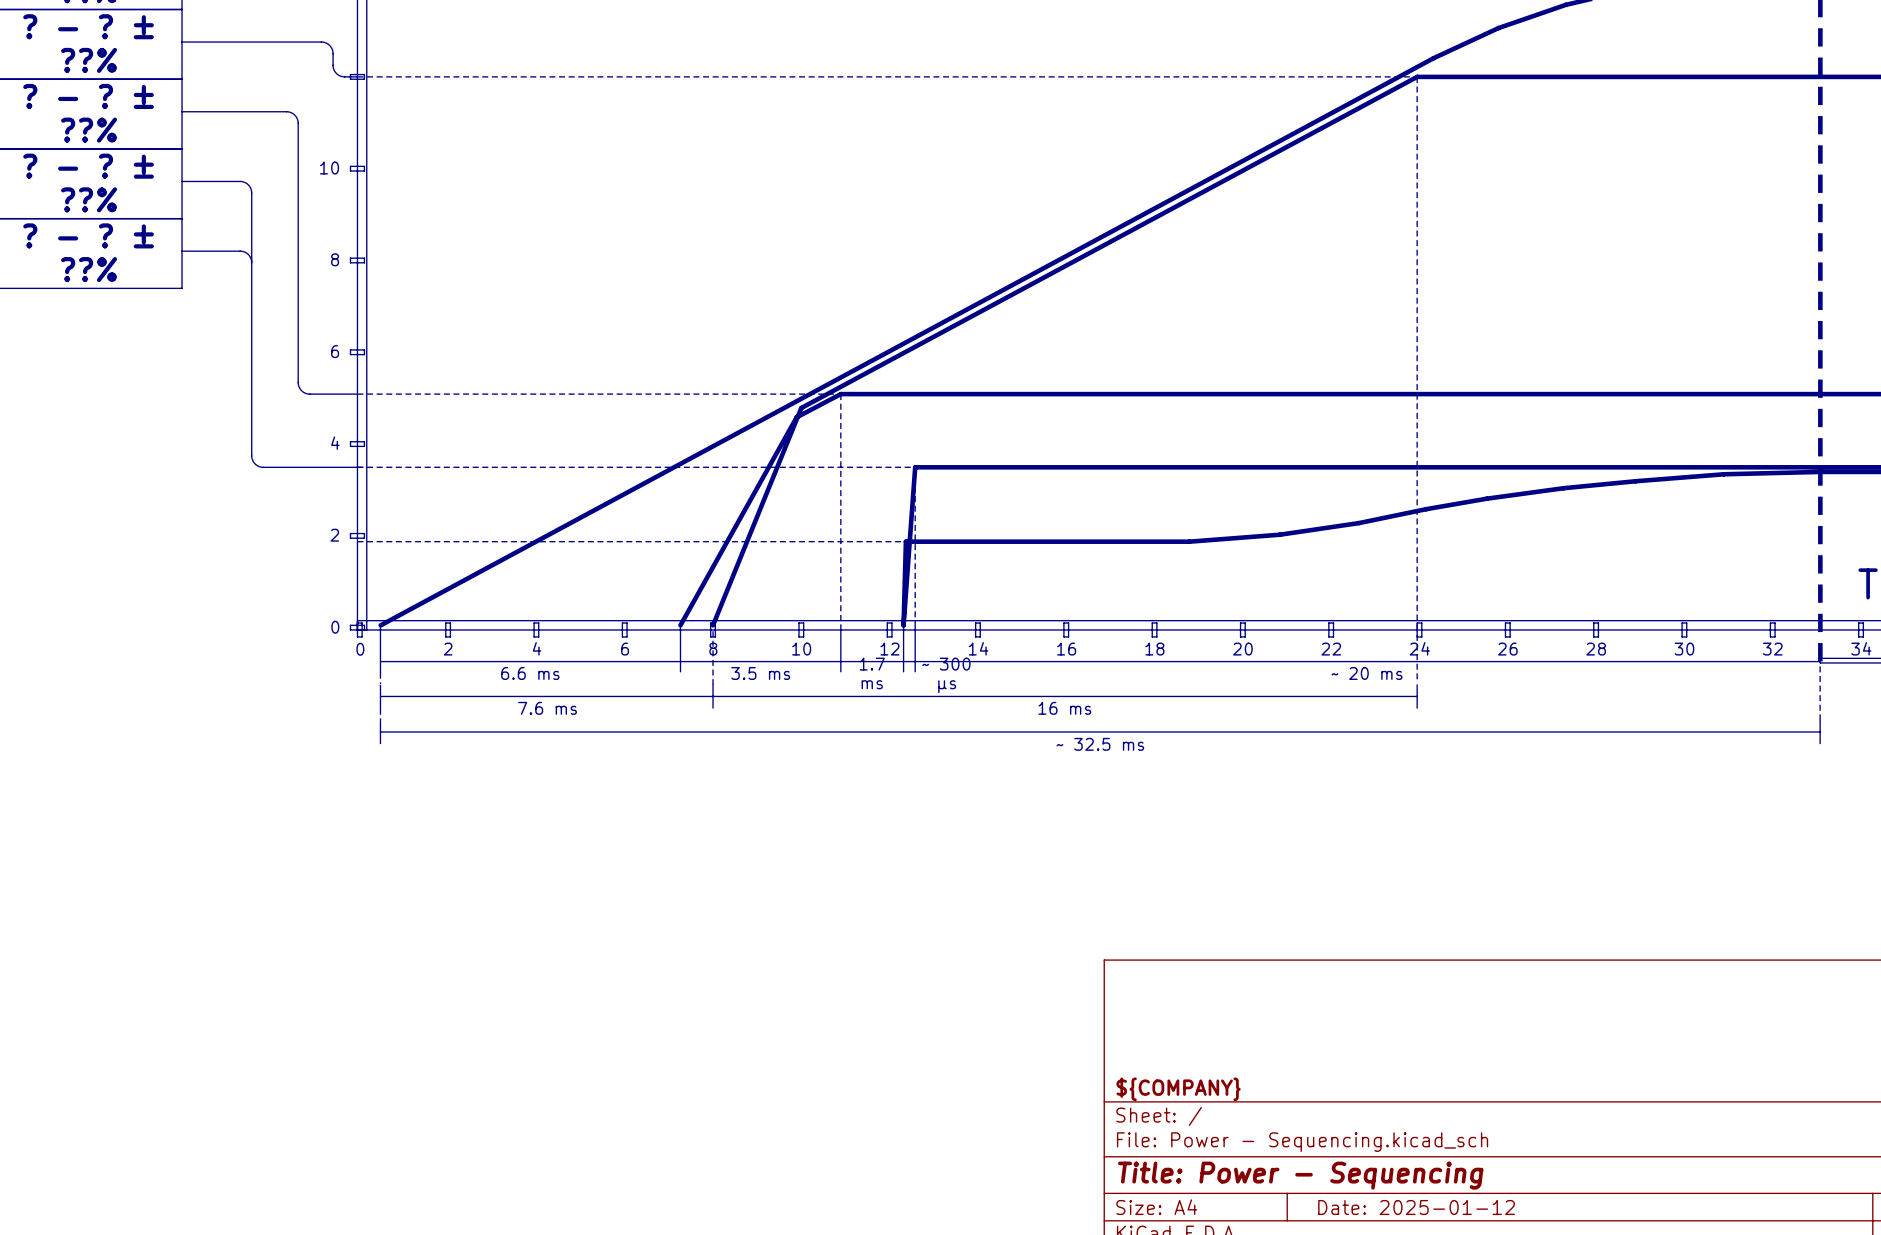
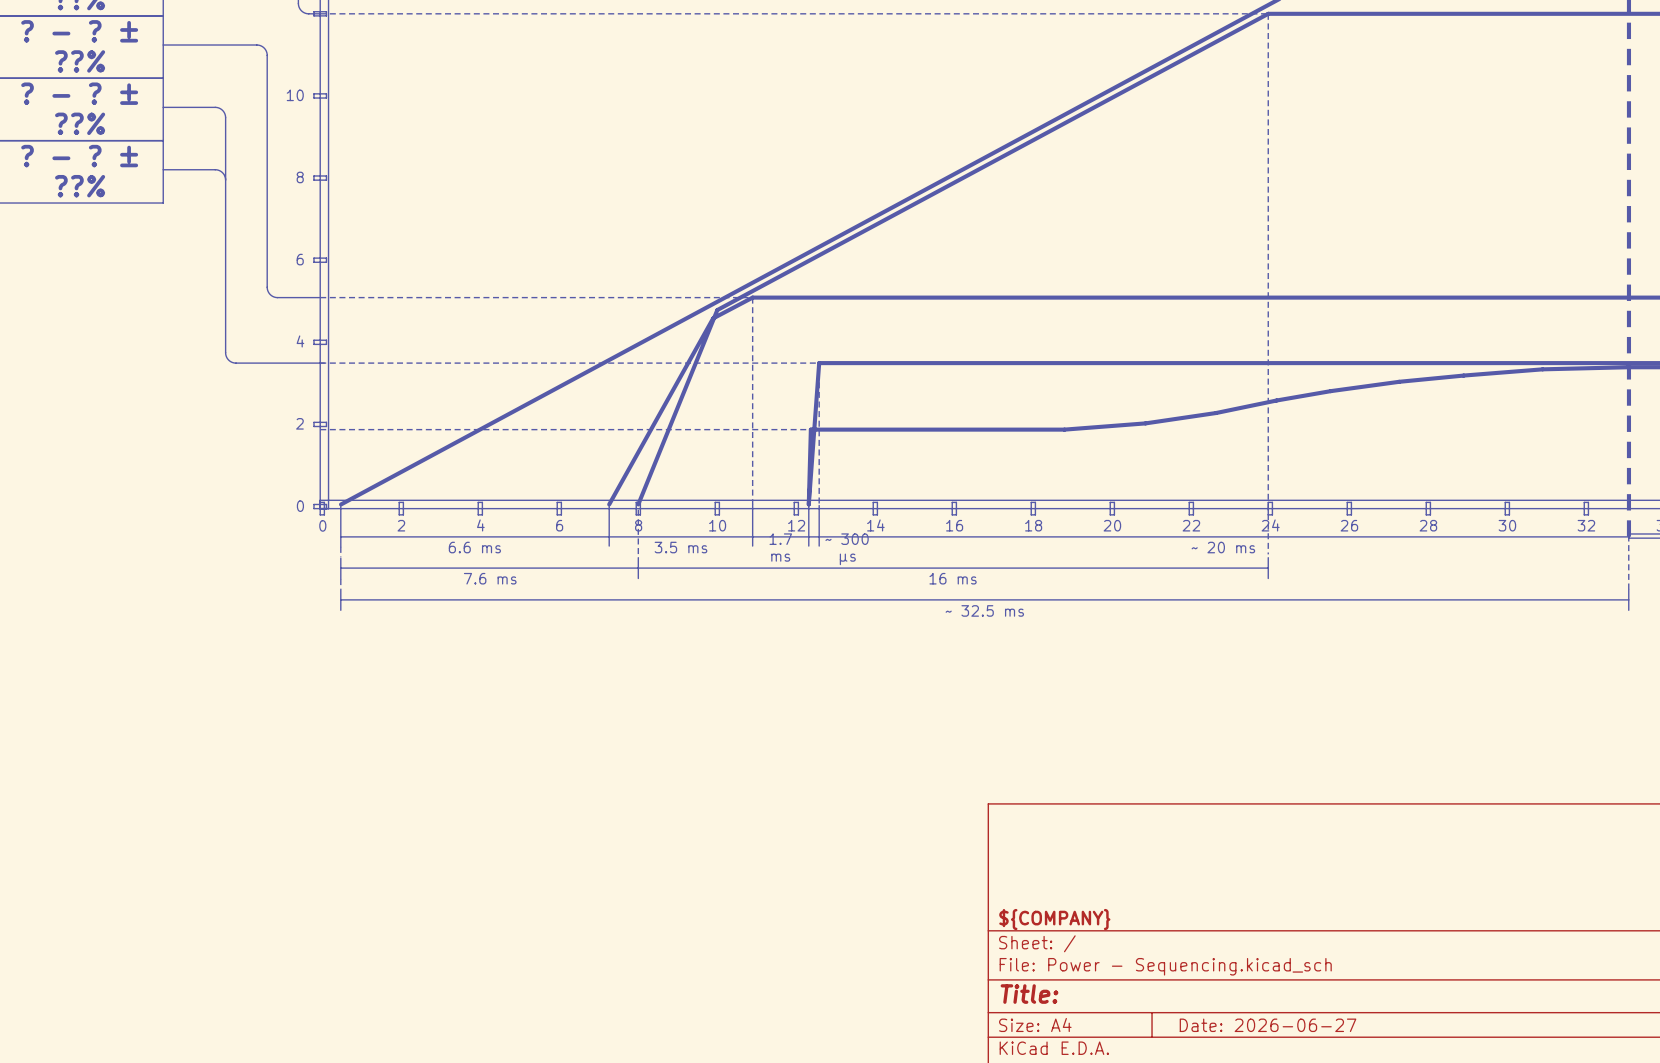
title block: Title: Power - Sequencing (1300, 1175) -> Title: (1029, 994)
title block: Date: 2025-01-12 (1416, 1207) -> Date: 2026-06-27 (1268, 1025)

